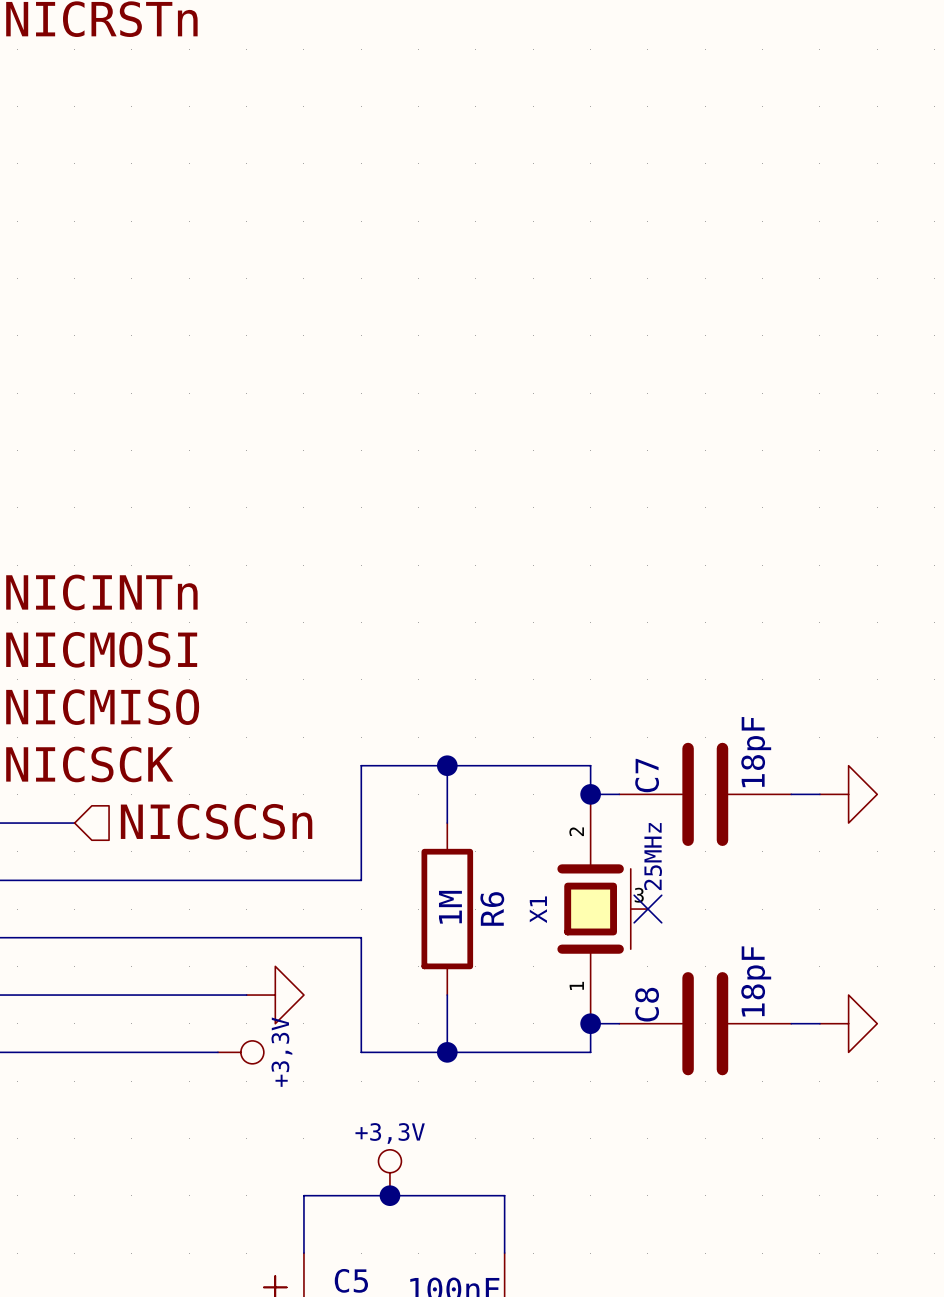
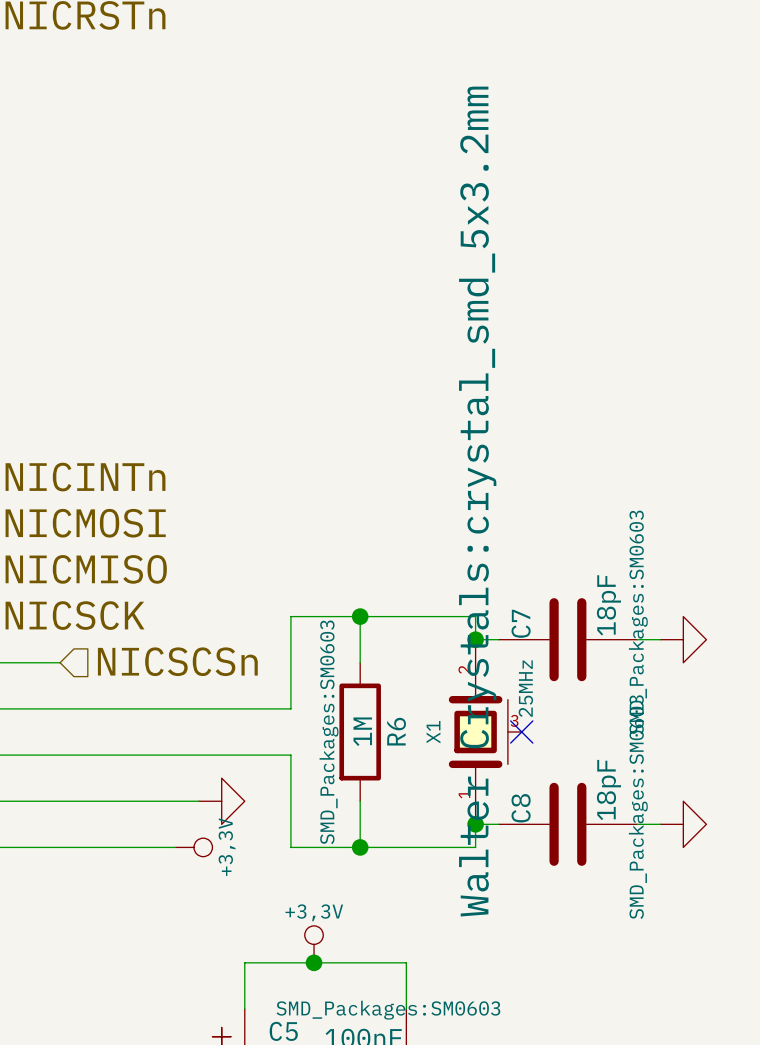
X1 text: none -> Walter Crystals:crystal_smd_5x3.2mm (477, 501)
C7 text: none -> SMD_Packages:SM0603 (638, 622)
R6 text: none -> SMD_Packages:SM0603 (329, 732)
C8 text: none -> SMD_Packages:SM0603 (638, 807)
part text: none -> SMD_Packages:SM0603 (388, 1010)

